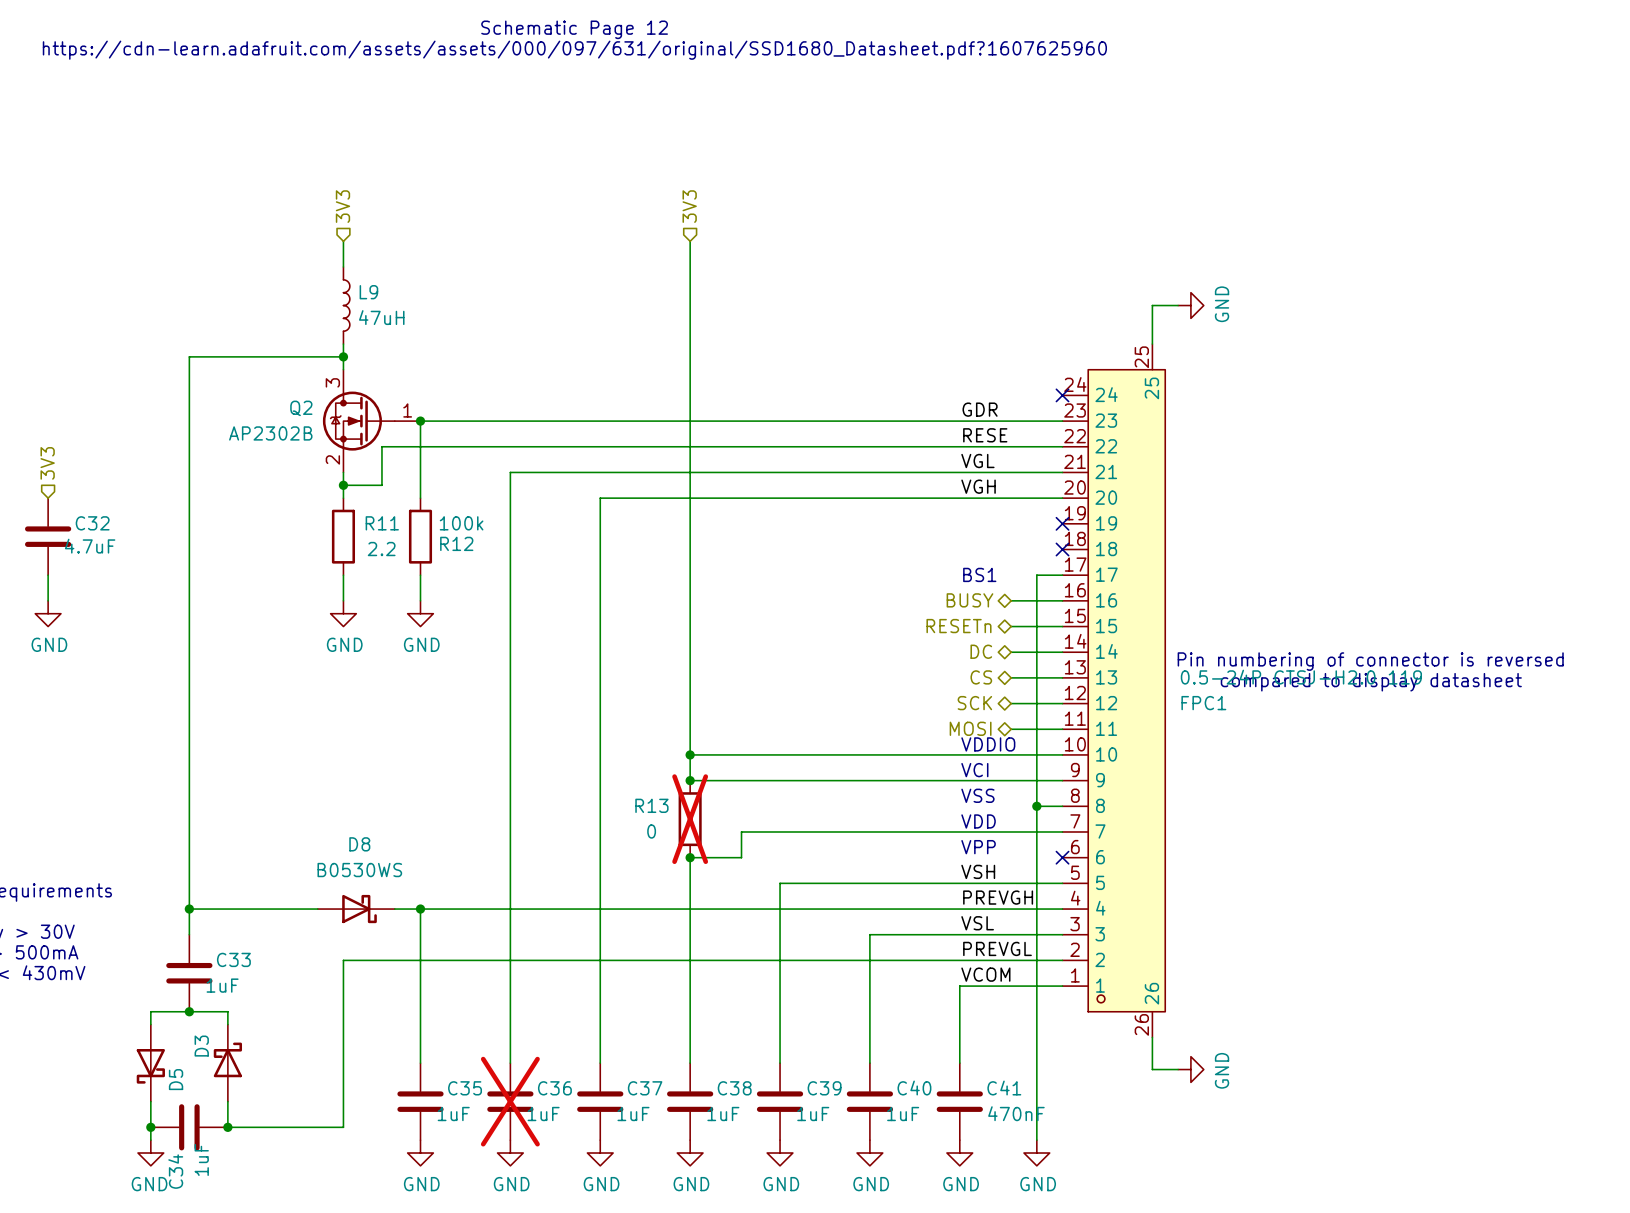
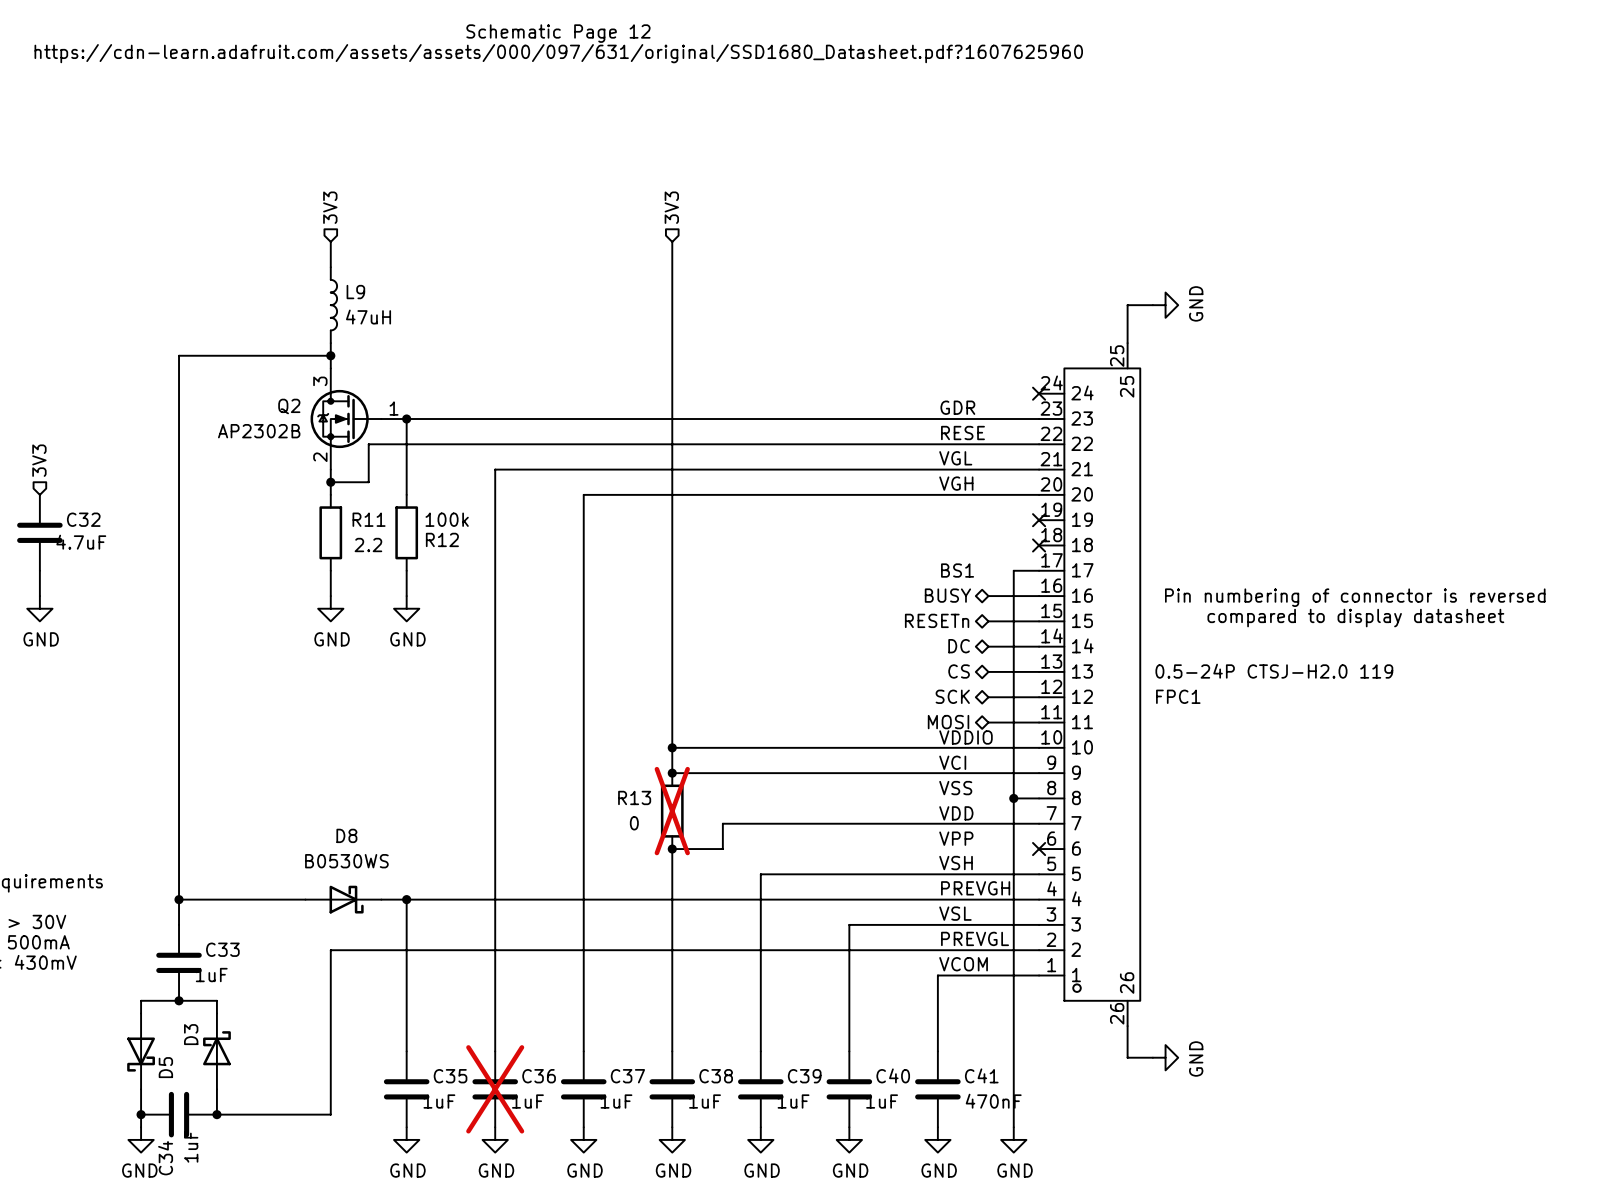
text position: Pin numbering of connector is reversed (1370, 661) -> Pin numbering of connector is reversed (1355, 597)
text position: compared to display datasheet (1371, 682) -> compared to display datasheet (1355, 618)

